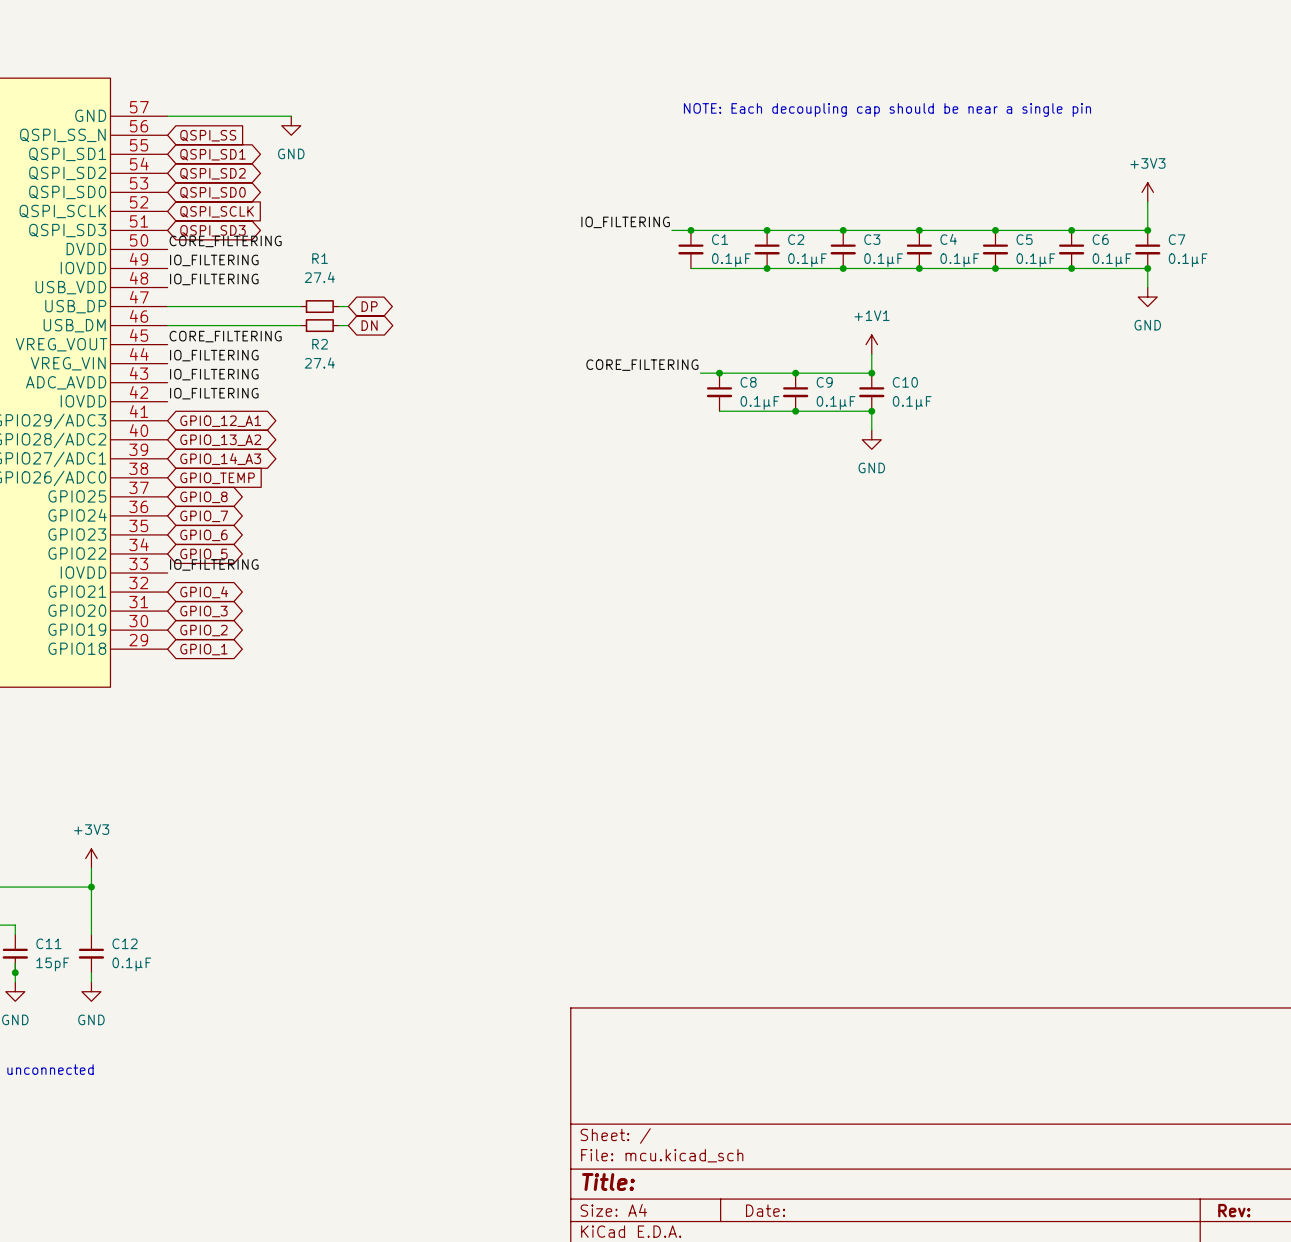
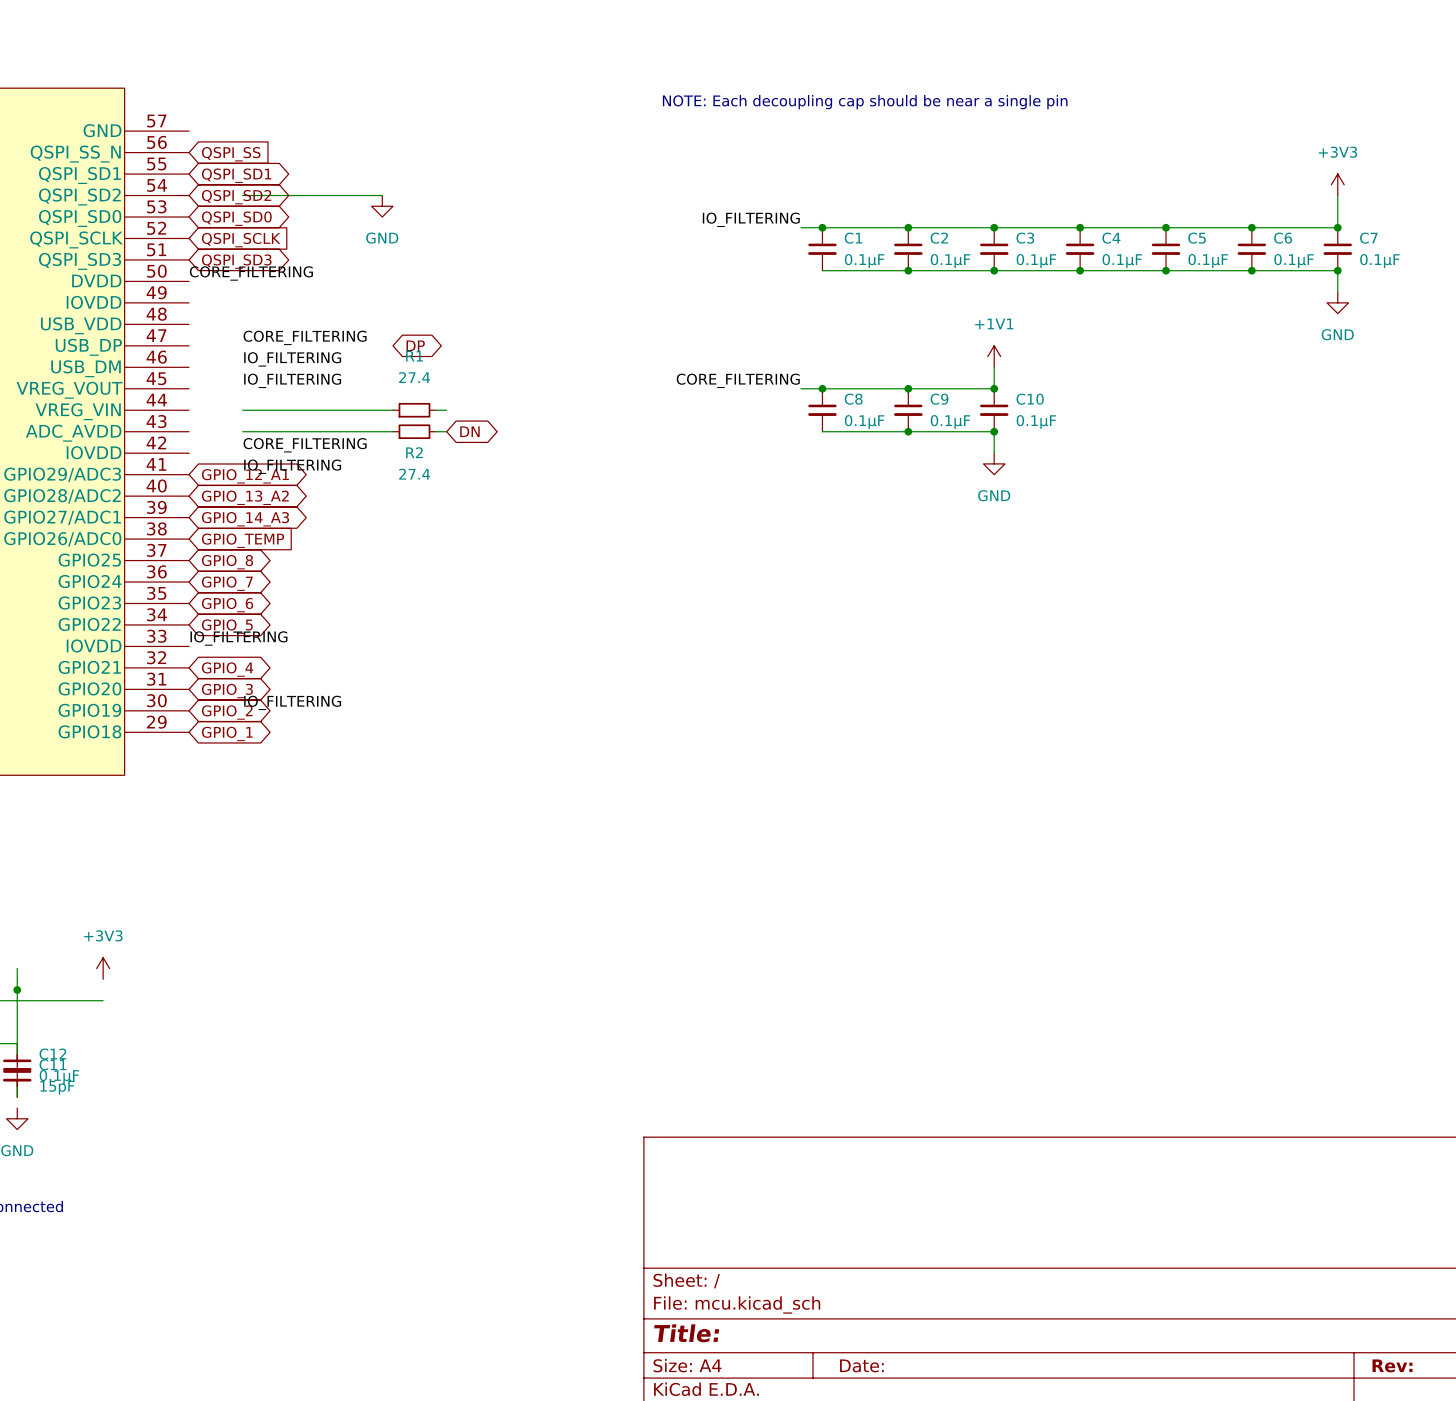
text position: NOTE: Each decoupling cap should be near a single pin (887, 110) -> NOTE: Each decoupling cap should be near a single pin (865, 102)
wire: (167, 116) (291, 116) -> (242, 195) (382, 195)
power symbol position: GND (291, 125) -> GND (382, 206)
power symbol position: +3V3 (1147, 192) -> +3V3 (1337, 184)
junction: none -> (822, 227)
junction: none -> (908, 227)
junction: none -> (994, 227)
junction: none -> (1080, 227)
junction: none -> (1165, 227)
junction: none -> (1251, 227)
wire: (1147, 201) (1147, 230) (671, 230) -> (1337, 195) (1337, 227) (800, 227)
junction: none -> (1337, 227)
label position: IO_FILTERING (625, 222) -> IO_FILTERING (751, 219)
junction: (690, 230) -> none
junction: (767, 230) -> none
junction: (843, 230) -> none
junction: (919, 230) -> none
junction: (995, 230) -> none
junction: (1071, 230) -> none
junction: (1147, 230) -> none
junction: none -> (908, 270)
junction: none -> (994, 270)
junction: none -> (1080, 270)
junction: none -> (1165, 270)
junction: none -> (1251, 270)
junction: none -> (1337, 270)
C1 position: (690, 249) -> (822, 249)
C2 position: (767, 249) -> (908, 249)
C3 position: (843, 249) -> (994, 249)
C4 position: (919, 249) -> (1080, 249)
C5 position: (995, 249) -> (1165, 249)
C6 position: (1071, 249) -> (1251, 249)
C7 position: (1147, 249) -> (1337, 249)
label: IO_FILTERING (214, 260) -> none
wire: (690, 268) (1147, 268) (1147, 287) -> (822, 270) (1337, 270) (1337, 292)
junction: (767, 268) -> none
junction: (843, 268) -> none
junction: (919, 268) -> none
junction: (995, 268) -> none
junction: (1071, 268) -> none
junction: (1147, 268) -> none
label: IO_FILTERING (214, 279) -> CORE_FILTERING (305, 337)
power symbol position: GND (1147, 297) -> GND (1337, 302)
wire: (167, 306) (300, 306) -> (242, 410) (393, 410)
R1 position: (319, 306) -> (414, 410)
wire: (338, 306) (348, 306) -> (435, 410) (446, 410)
label: none -> IO_FILTERING (292, 359)
wire: (167, 325) (300, 325) -> (242, 431) (393, 431)
R2 position: (319, 325) -> (414, 431)
wire: (338, 325) (348, 325) -> (435, 431) (446, 431)
global label position: DN (369, 325) -> DN (469, 431)
label: CORE_FILTERING (225, 336) -> none
label: none -> IO_FILTERING (292, 380)
junction: none -> (908, 388)
power symbol position: +1V1 (871, 344) -> +1V1 (994, 356)
junction: none -> (994, 388)
wire: (871, 354) (871, 373) (700, 373) -> (994, 367) (994, 388) (800, 388)
label: IO_FILTERING (214, 355) -> none
label position: CORE_FILTERING (642, 365) -> CORE_FILTERING (738, 380)
junction position: (719, 373) -> (822, 388)
junction position: (795, 373) -> (908, 431)
junction position: (871, 373) -> (994, 431)
label: IO_FILTERING (214, 374) -> none
C8 position: (719, 392) -> (822, 410)
C9 position: (795, 392) -> (908, 410)
C10 position: (871, 392) -> (994, 410)
label: IO_FILTERING (214, 393) -> none
label: none -> CORE_FILTERING (305, 445)
wire: (719, 411) (871, 411) (871, 430) -> (822, 431) (994, 431) (994, 453)
junction: (795, 411) -> none
junction: (871, 411) -> none
label: none -> IO_FILTERING (292, 466)
power symbol position: GND (871, 439) -> GND (994, 463)
label: none -> IO_FILTERING (292, 702)
wire: (91, 868) (91, 934) -> (17, 968) (17, 1043)
junction: none -> (17, 989)
junction: (91, 887) -> none
C12 position: (91, 953) -> (17, 1065)
wire: (15, 972) (15, 982) -> none
junction: (15, 972) -> none
wire: (91, 972) (91, 982) -> none
power symbol: GND (91, 991) -> none

